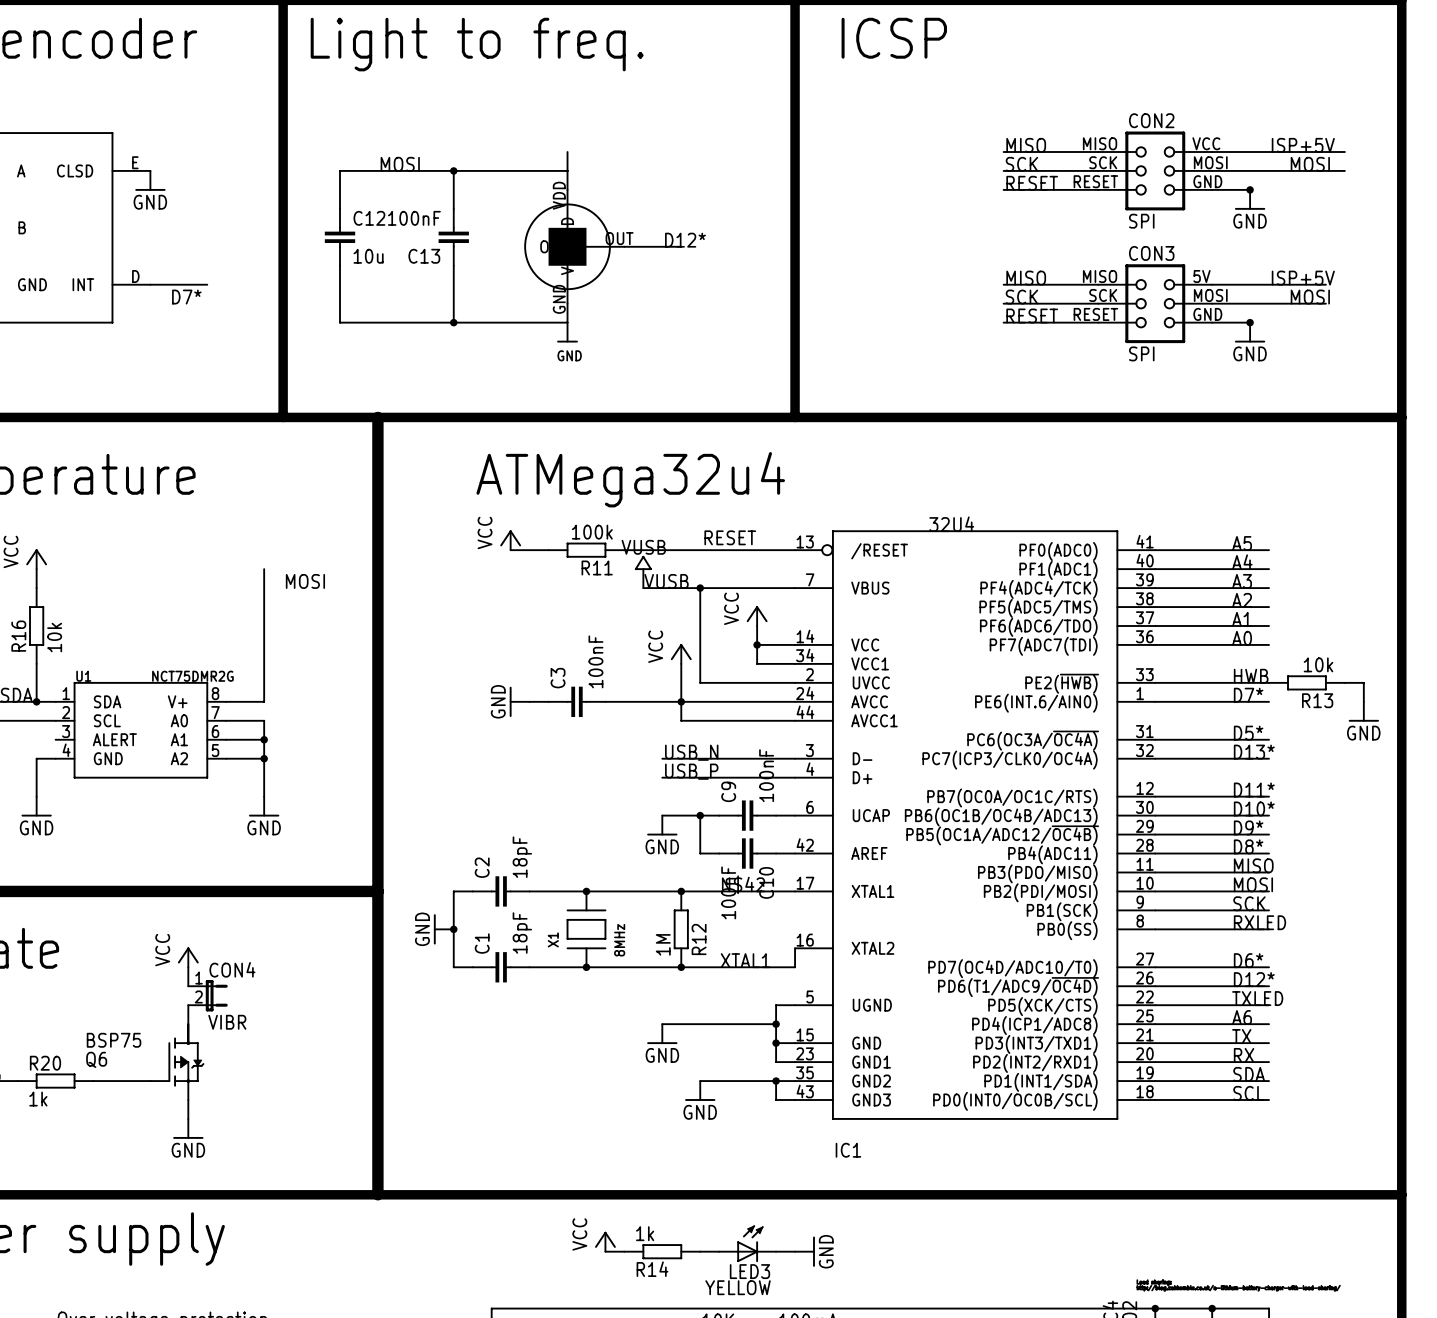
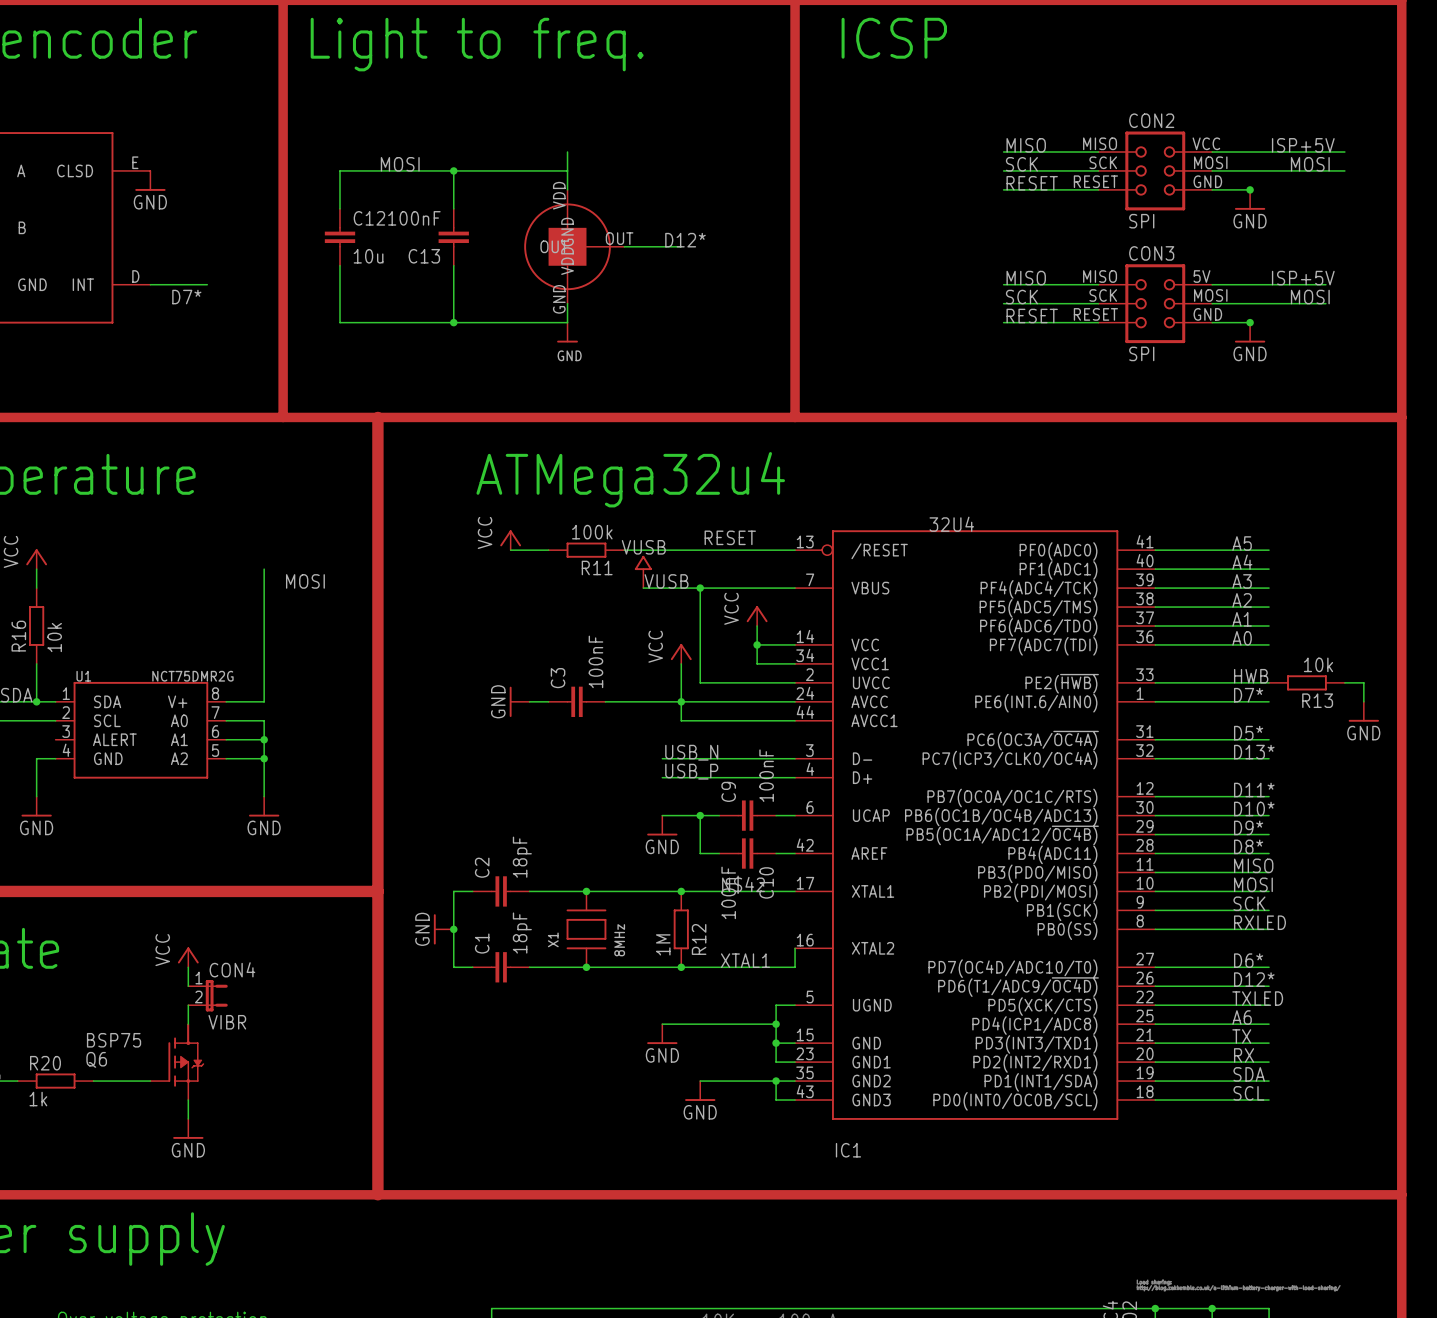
power symbol: VCC (605, 1241) -> none
LED3: YELLOW (747, 1243) -> none
wire: (605, 1251) (624, 1251) -> none
R14: 1k (662, 1251) -> none
wire: (700, 1251) (719, 1251) -> none
wire: (776, 1251) (795, 1251) -> none
power symbol: GND (804, 1251) -> none

